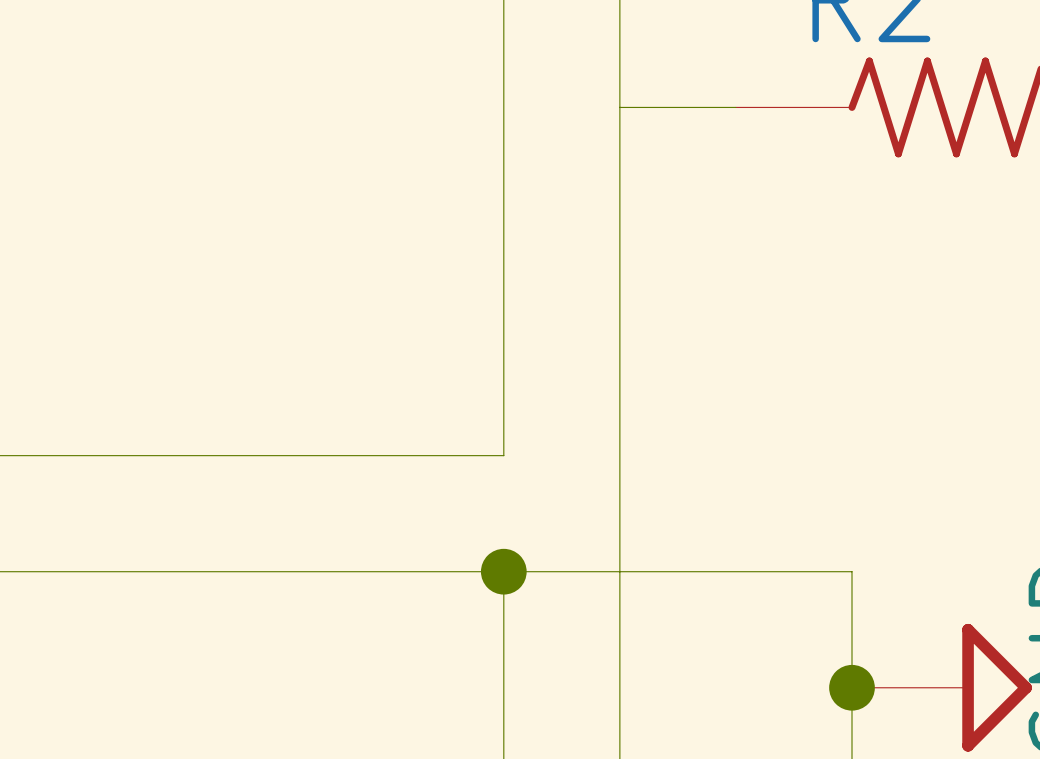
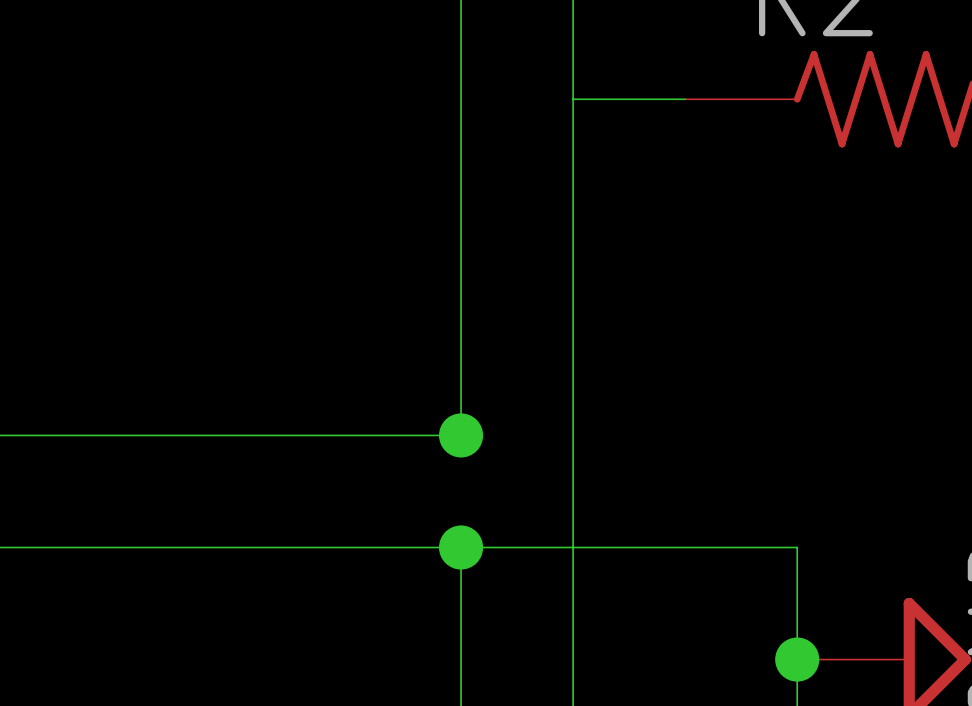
junction: none -> (461, 435)

